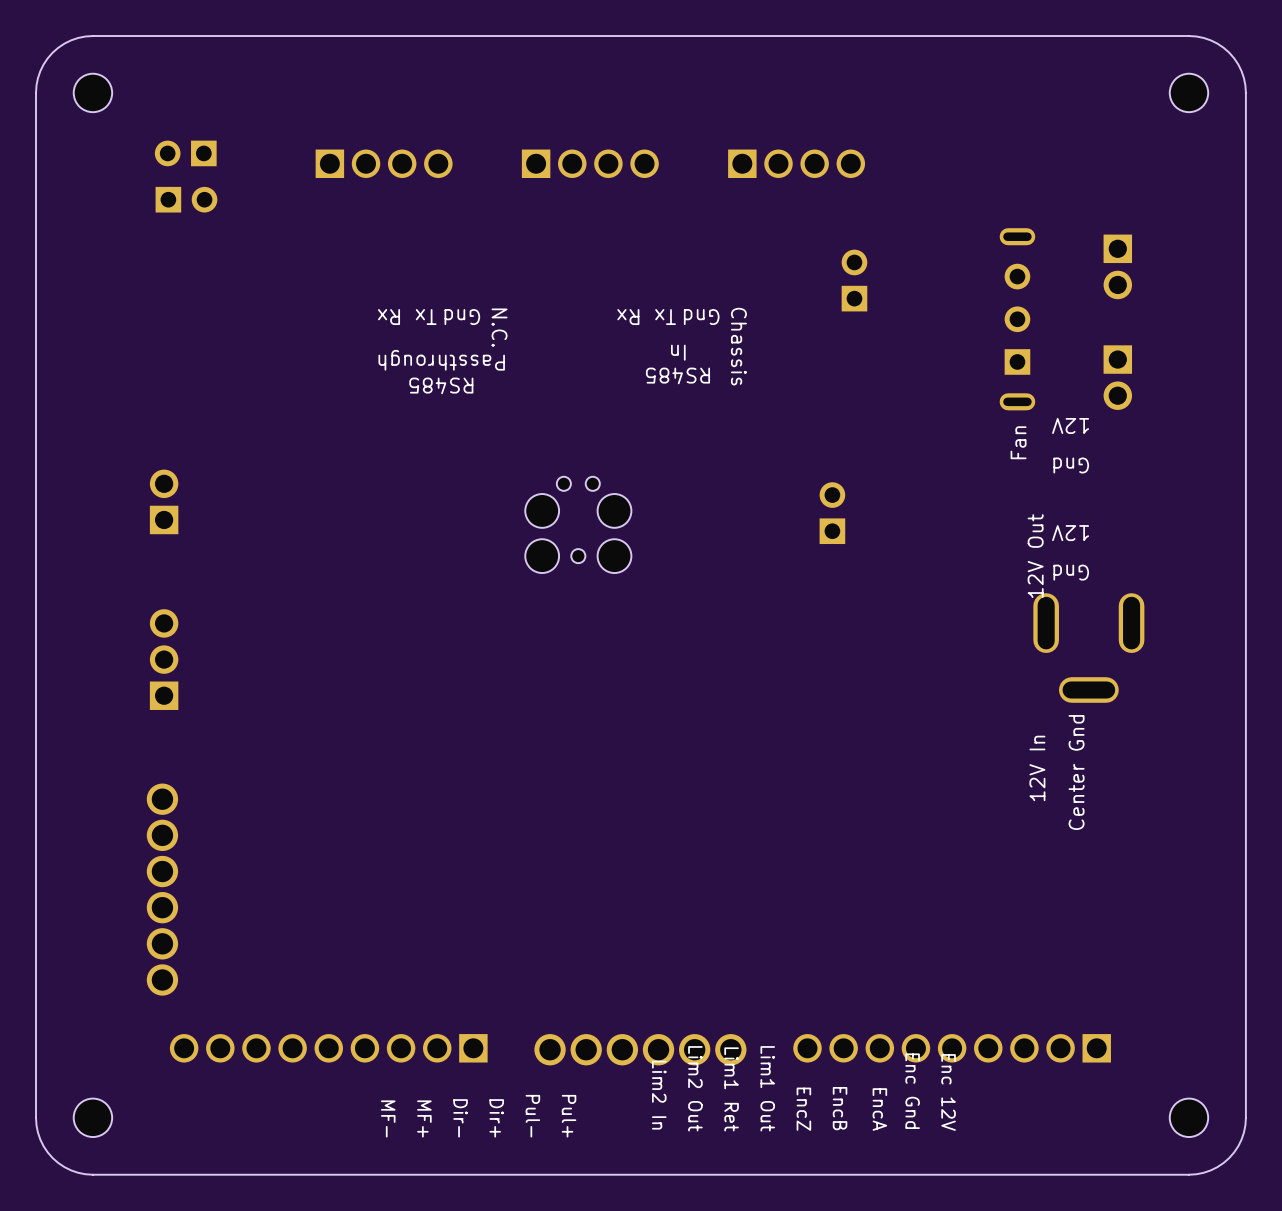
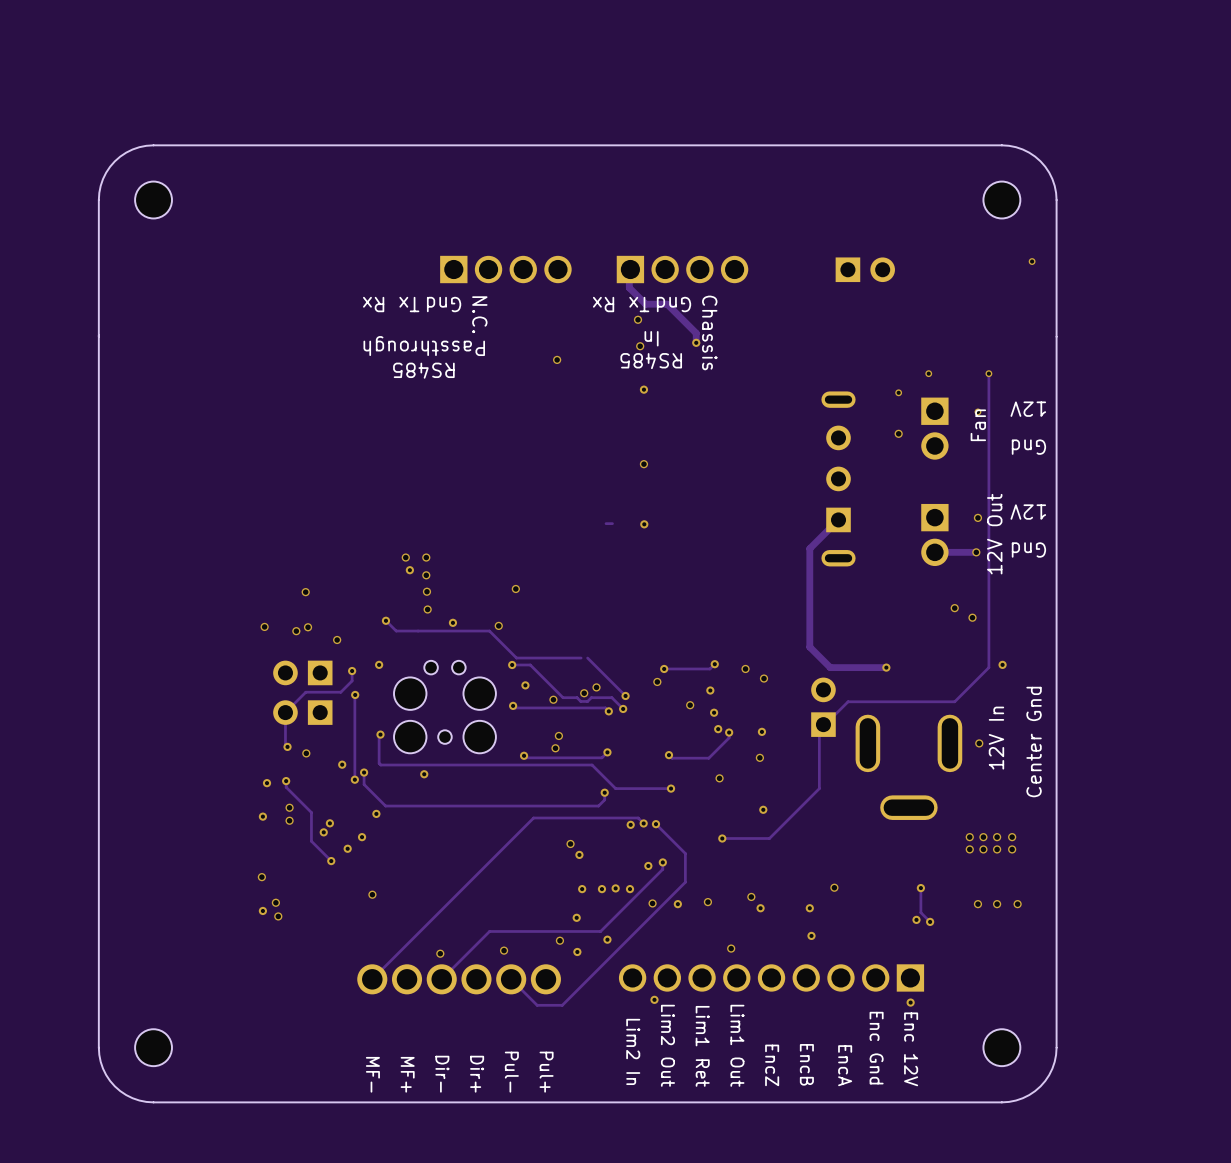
board edge: (1188, 36) (92, 36) (71, 40) (52, 52) (40, 71) (36, 92) (36, 1117) (40, 1139) (52, 1158) (71, 1170) (92, 1174) (1188, 1174) (1210, 1170) (1229, 1158) (1241, 1139) (1245, 1117) (1245, 92) (1241, 71) (1229, 52) (1210, 40) (1188, 36) -> (1001, 145) (1022, 149) (1040, 161) (1052, 179) (1056, 200) (1056, 1047) (1052, 1068) (1040, 1086) (1022, 1098) (1001, 1102) (153, 1102) (132, 1098) (114, 1086) (103, 1068) (98, 1047) (98, 200) (103, 179) (114, 161) (132, 149) (153, 145) (1001, 145)
part position: (92, 92) -> (153, 200)
part position: (1188, 92) -> (1001, 200)
part: (185, 153) -> none
part: (384, 163) -> none
part: (590, 163) -> none
part: (796, 163) -> none
part: (186, 199) -> none
part: (1117, 266) -> none
via: none -> (1032, 261)
part: none -> (505, 269)
part: none -> (682, 269)
part rotation: 0° (854, 280) -> 90° clockwise (865, 269)
part position: (854, 280) -> (865, 269)
track: none -> (629, 271) (629, 287) (645, 304) (667, 304) (696, 333) (696, 342)
part position: (1017, 319) -> (838, 478)
via: none -> (638, 319)
via: none -> (696, 342)
via: none -> (640, 346)
via: none -> (557, 359)
part: (1117, 377) -> none
via: none -> (928, 373)
track: none -> (988, 373) (988, 667) (954, 701) (848, 701) (819, 730)
via: none -> (988, 373)
via: none -> (643, 389)
via: none -> (898, 392)
via: none -> (977, 411)
part: none -> (934, 428)
via: none -> (898, 433)
via: none -> (643, 464)
part: (164, 501) -> none
part: (832, 513) -> none
part position: (578, 524) -> (444, 707)
via: none -> (977, 517)
track: none -> (838, 519) (809, 548) (809, 647) (830, 667) (886, 667)
track: none -> (612, 523) (606, 523)
via: none -> (644, 524)
part: none -> (934, 534)
track: none -> (976, 552) (934, 552)
via: none -> (976, 552)
via: none -> (405, 557)
via: none -> (426, 557)
via: none -> (409, 570)
via: none -> (426, 575)
via: none -> (515, 588)
via: none -> (305, 592)
via: none -> (426, 591)
via: none -> (954, 608)
via: none -> (427, 609)
via: none -> (972, 617)
track: none -> (385, 620) (396, 631) (489, 631) (516, 658) (581, 658)
via: none -> (385, 620)
via: none -> (452, 622)
part position: (1088, 648) -> (908, 767)
via: none -> (498, 625)
via: none -> (264, 626)
via: none -> (308, 627)
via: none -> (296, 631)
part: (164, 659) -> none
via: none -> (337, 639)
track: none -> (587, 658) (625, 695)
track: none -> (714, 664) (709, 668) (664, 668)
via: none -> (714, 664)
via: none -> (379, 664)
track: none -> (512, 664) (530, 664) (563, 697) (577, 697) (580, 701) (587, 701) (591, 697) (611, 697) (623, 708)
via: none -> (512, 664)
via: none -> (1002, 664)
via: none -> (886, 667)
via: none -> (664, 668)
via: none -> (745, 668)
track: none -> (352, 671) (352, 680) (340, 692) (305, 692) (285, 712) (285, 744) (287, 746)
via: none -> (352, 671)
part: none -> (302, 672)
via: none -> (763, 678)
via: none -> (657, 681)
via: none -> (525, 685)
via: none -> (596, 687)
via: none -> (710, 690)
via: none -> (584, 693)
track: none -> (355, 694) (354, 779)
via: none -> (355, 694)
via: none -> (625, 695)
via: none -> (553, 699)
track: none -> (513, 705) (515, 707) (605, 707) (608, 711)
via: none -> (513, 705)
via: none -> (690, 705)
part: none -> (823, 707)
via: none -> (623, 708)
via: none -> (608, 711)
part: none -> (302, 712)
via: none -> (714, 712)
via: none -> (718, 729)
track: none -> (819, 729) (819, 788) (769, 838) (722, 838)
via: none -> (761, 731)
track: none -> (729, 732) (729, 737) (708, 758) (672, 758) (668, 755)
via: none -> (729, 732)
track: none -> (380, 734) (379, 763) (380, 765) (592, 765) (615, 788) (671, 788)
via: none -> (380, 734)
via: none -> (558, 735)
via: none -> (979, 743)
via: none -> (287, 746)
via: none -> (555, 748)
track: none -> (607, 752) (601, 757) (526, 757) (524, 755)
via: none -> (607, 752)
via: none -> (306, 753)
via: none -> (524, 755)
via: none -> (668, 755)
via: none -> (759, 757)
via: none -> (342, 764)
track: none -> (364, 772) (364, 784) (385, 806) (598, 806) (604, 799) (604, 792)
via: none -> (364, 772)
via: none -> (424, 774)
via: none -> (719, 778)
via: none -> (354, 779)
track: none -> (286, 781) (286, 787) (311, 812) (311, 841) (331, 861)
via: none -> (286, 781)
via: none -> (267, 783)
via: none -> (671, 788)
via: none -> (604, 792)
via: none -> (289, 807)
via: none -> (763, 809)
via: none -> (376, 813)
via: none -> (262, 816)
via: none -> (289, 820)
via: none -> (329, 823)
track: none -> (643, 823) (638, 818) (533, 818) (372, 979)
via: none -> (643, 823)
via: none -> (630, 824)
track: none -> (655, 824) (685, 853) (685, 882) (562, 1005) (537, 1005) (511, 979)
via: none -> (655, 824)
via: none -> (323, 832)
via: none -> (362, 837)
via: none -> (969, 837)
via: none -> (983, 837)
via: none -> (997, 837)
via: none -> (1012, 837)
via: none -> (722, 838)
via: none -> (570, 843)
via: none -> (347, 848)
via: none -> (969, 849)
via: none -> (983, 849)
via: none -> (997, 849)
via: none -> (1012, 849)
part: (162, 889) -> none
via: none -> (579, 854)
via: none -> (331, 861)
track: none -> (662, 862) (662, 869) (600, 931) (489, 931) (441, 979)
via: none -> (662, 862)
via: none -> (648, 865)
via: none -> (261, 877)
via: none -> (615, 888)
via: none -> (834, 887)
track: none -> (920, 888) (920, 912) (930, 921)
via: none -> (920, 888)
via: none -> (582, 889)
via: none -> (601, 889)
via: none -> (630, 889)
via: none -> (372, 894)
via: none -> (751, 896)
via: none -> (275, 902)
via: none -> (707, 902)
via: none -> (652, 903)
via: none -> (677, 904)
via: none -> (977, 904)
via: none -> (997, 904)
via: none -> (1017, 904)
via: none -> (760, 908)
via: none -> (809, 908)
via: none -> (262, 910)
via: none -> (278, 916)
via: none -> (576, 917)
via: none -> (916, 919)
via: none -> (930, 921)
via: none -> (811, 935)
via: none -> (607, 939)
via: none -> (559, 940)
via: none -> (731, 948)
via: none -> (504, 950)
via: none -> (577, 951)
via: none -> (440, 953)
via: none -> (654, 999)
via: none -> (910, 1002)
part: (328, 1048) -> none
part position: (952, 1048) -> (771, 977)
part position: (640, 1049) -> (459, 979)
part position: (92, 1117) -> (153, 1047)
part position: (1188, 1117) -> (1001, 1047)

